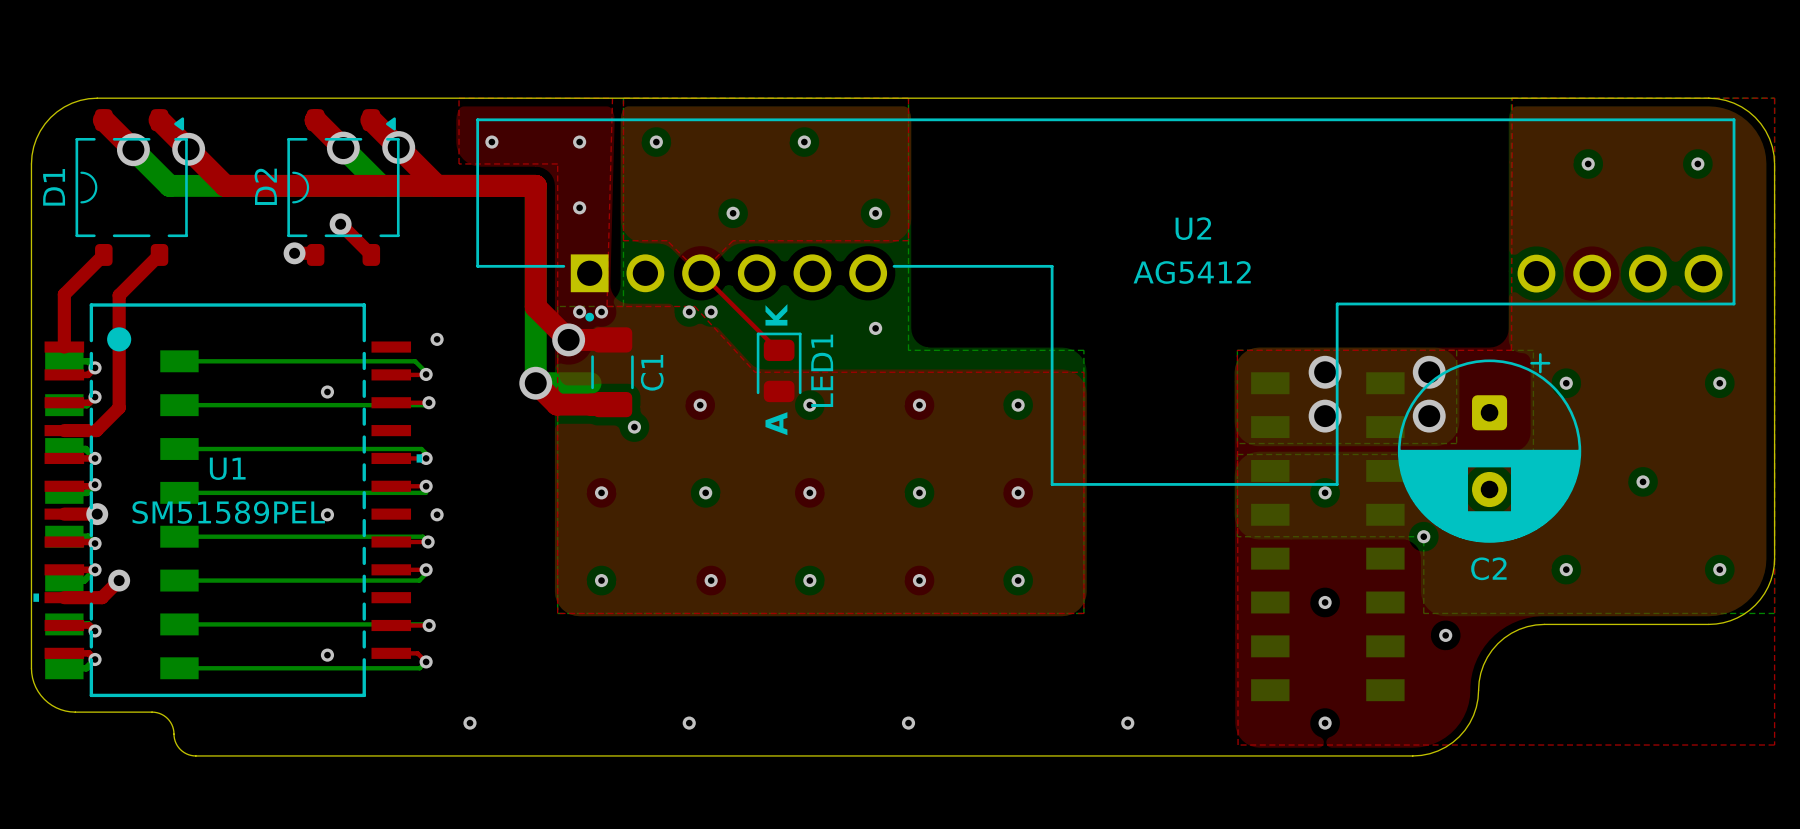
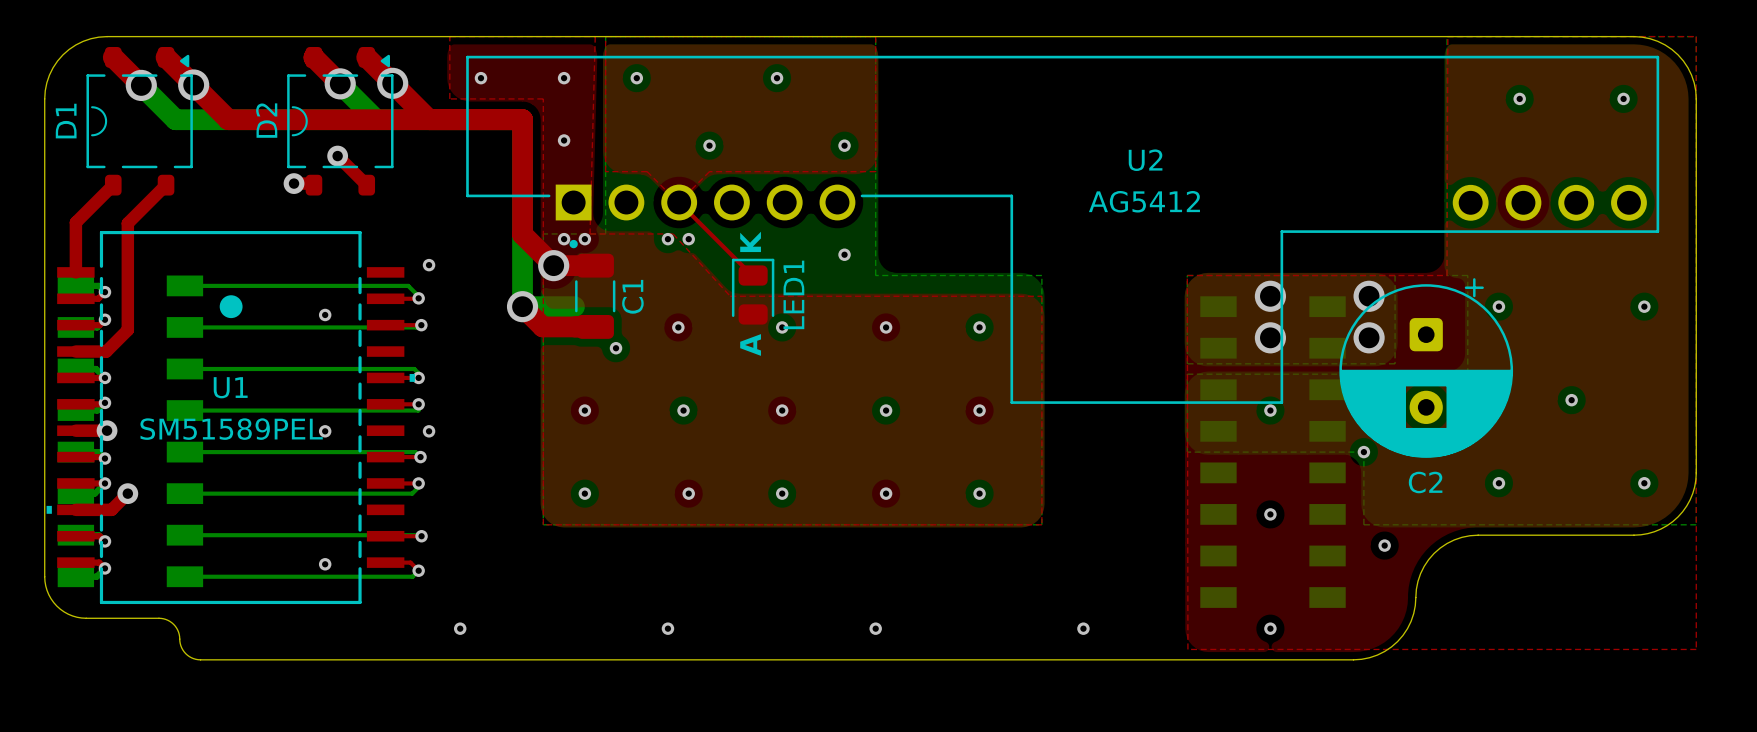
drawing position: (119, 339) -> (231, 306)

